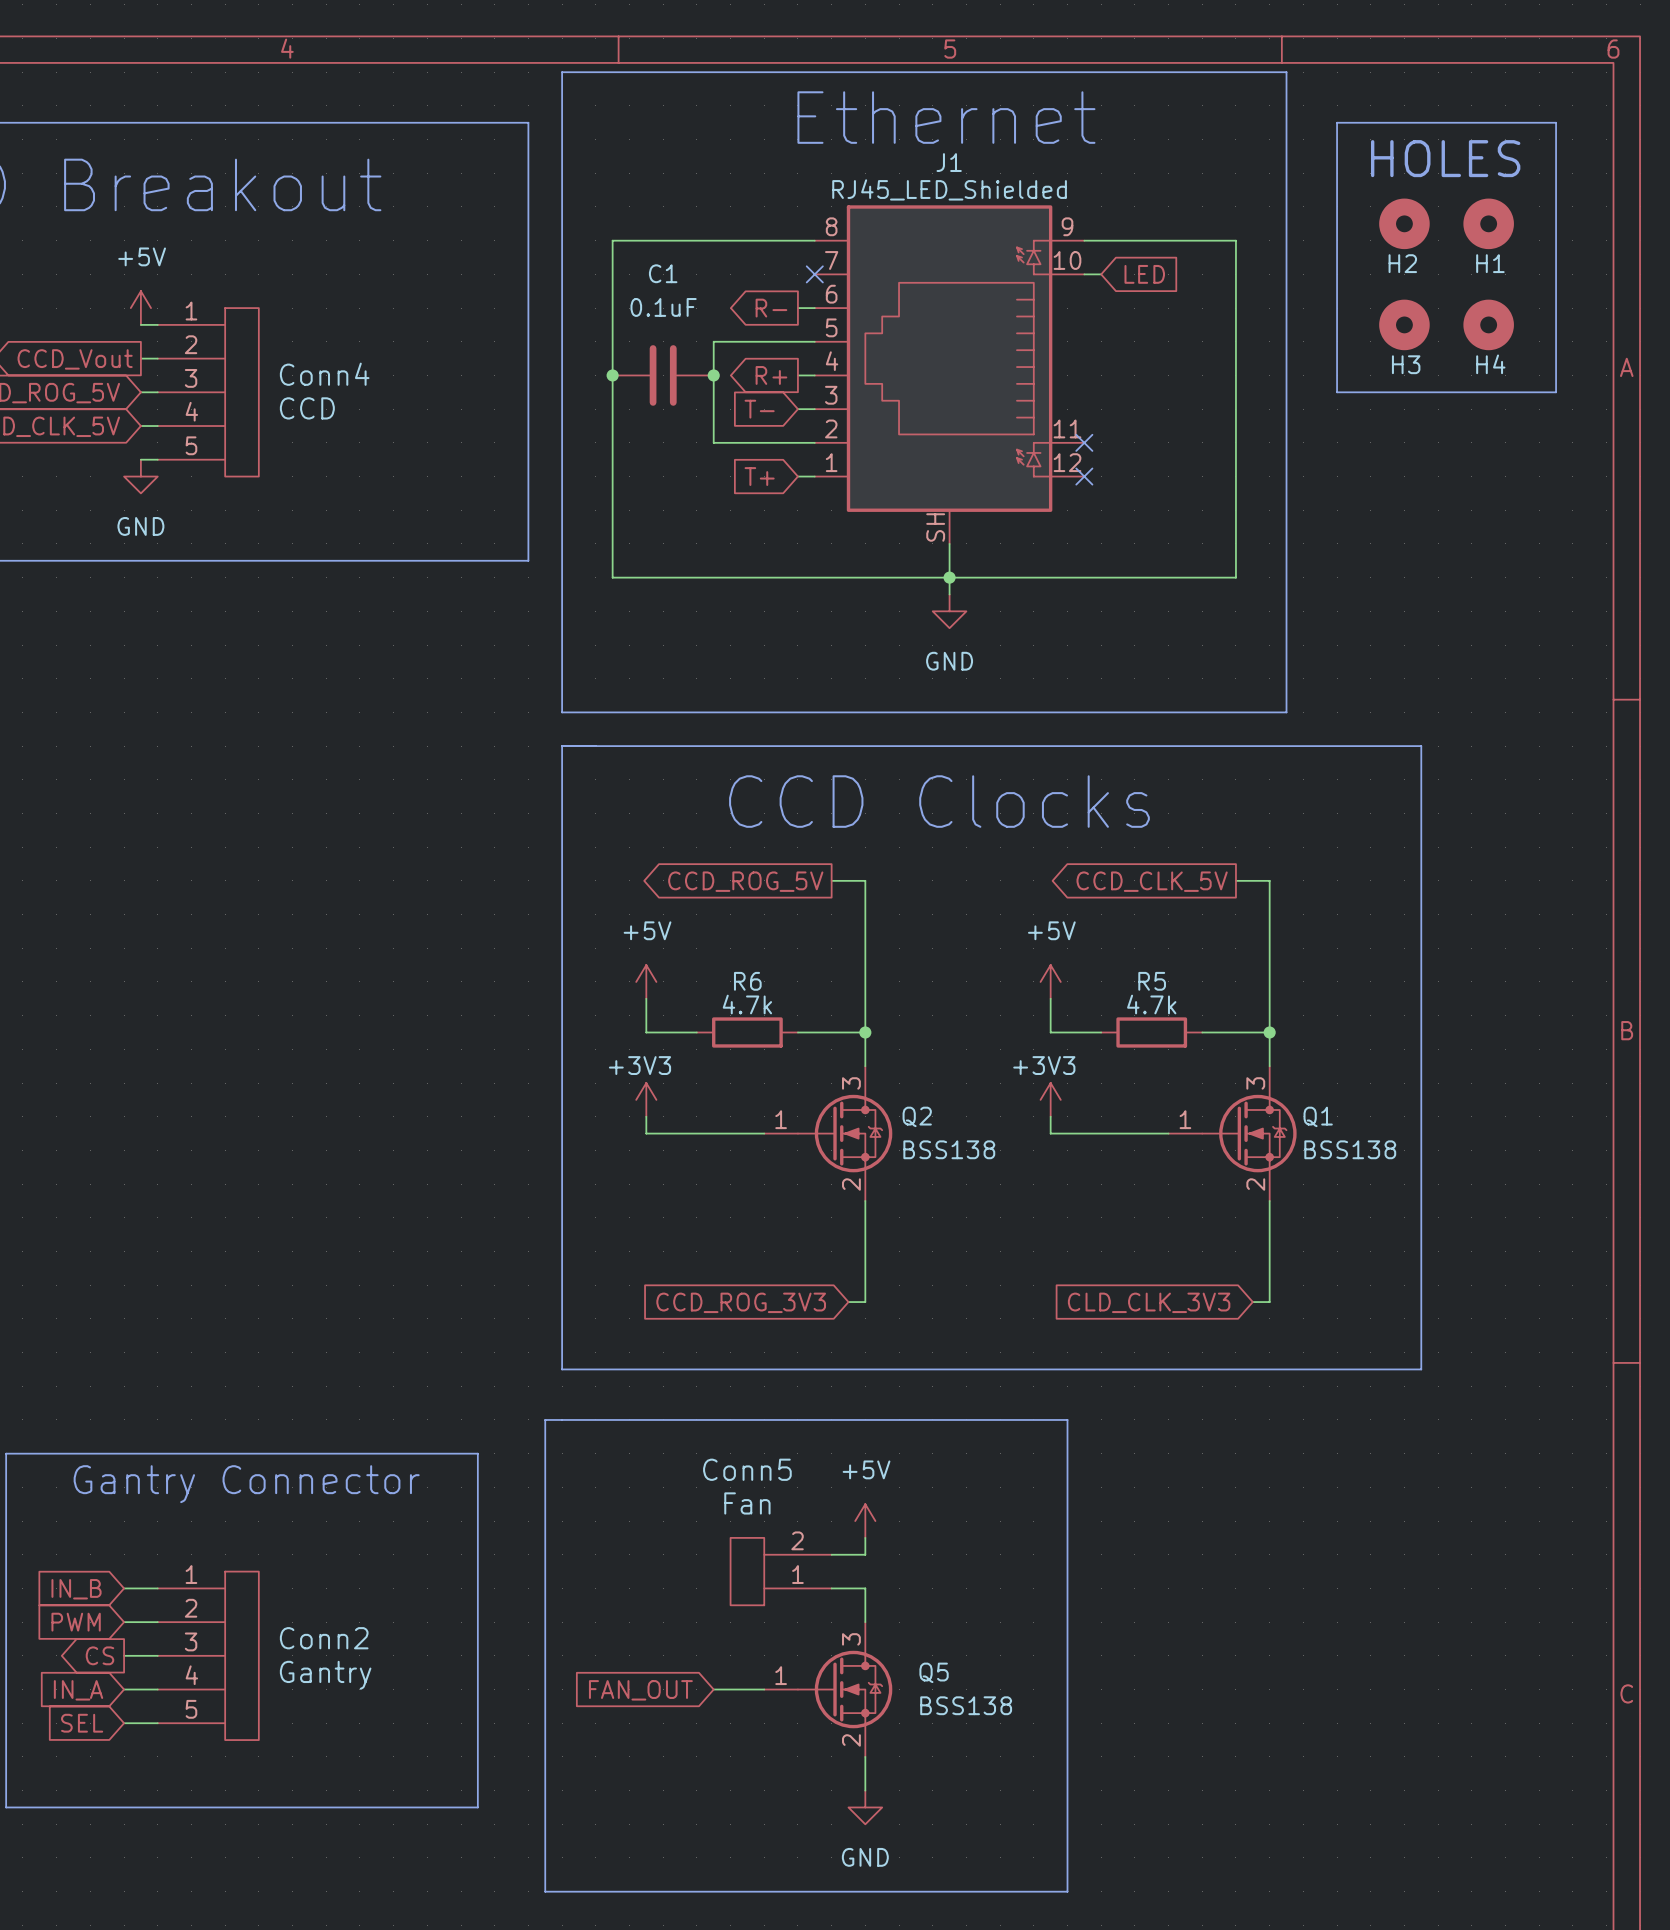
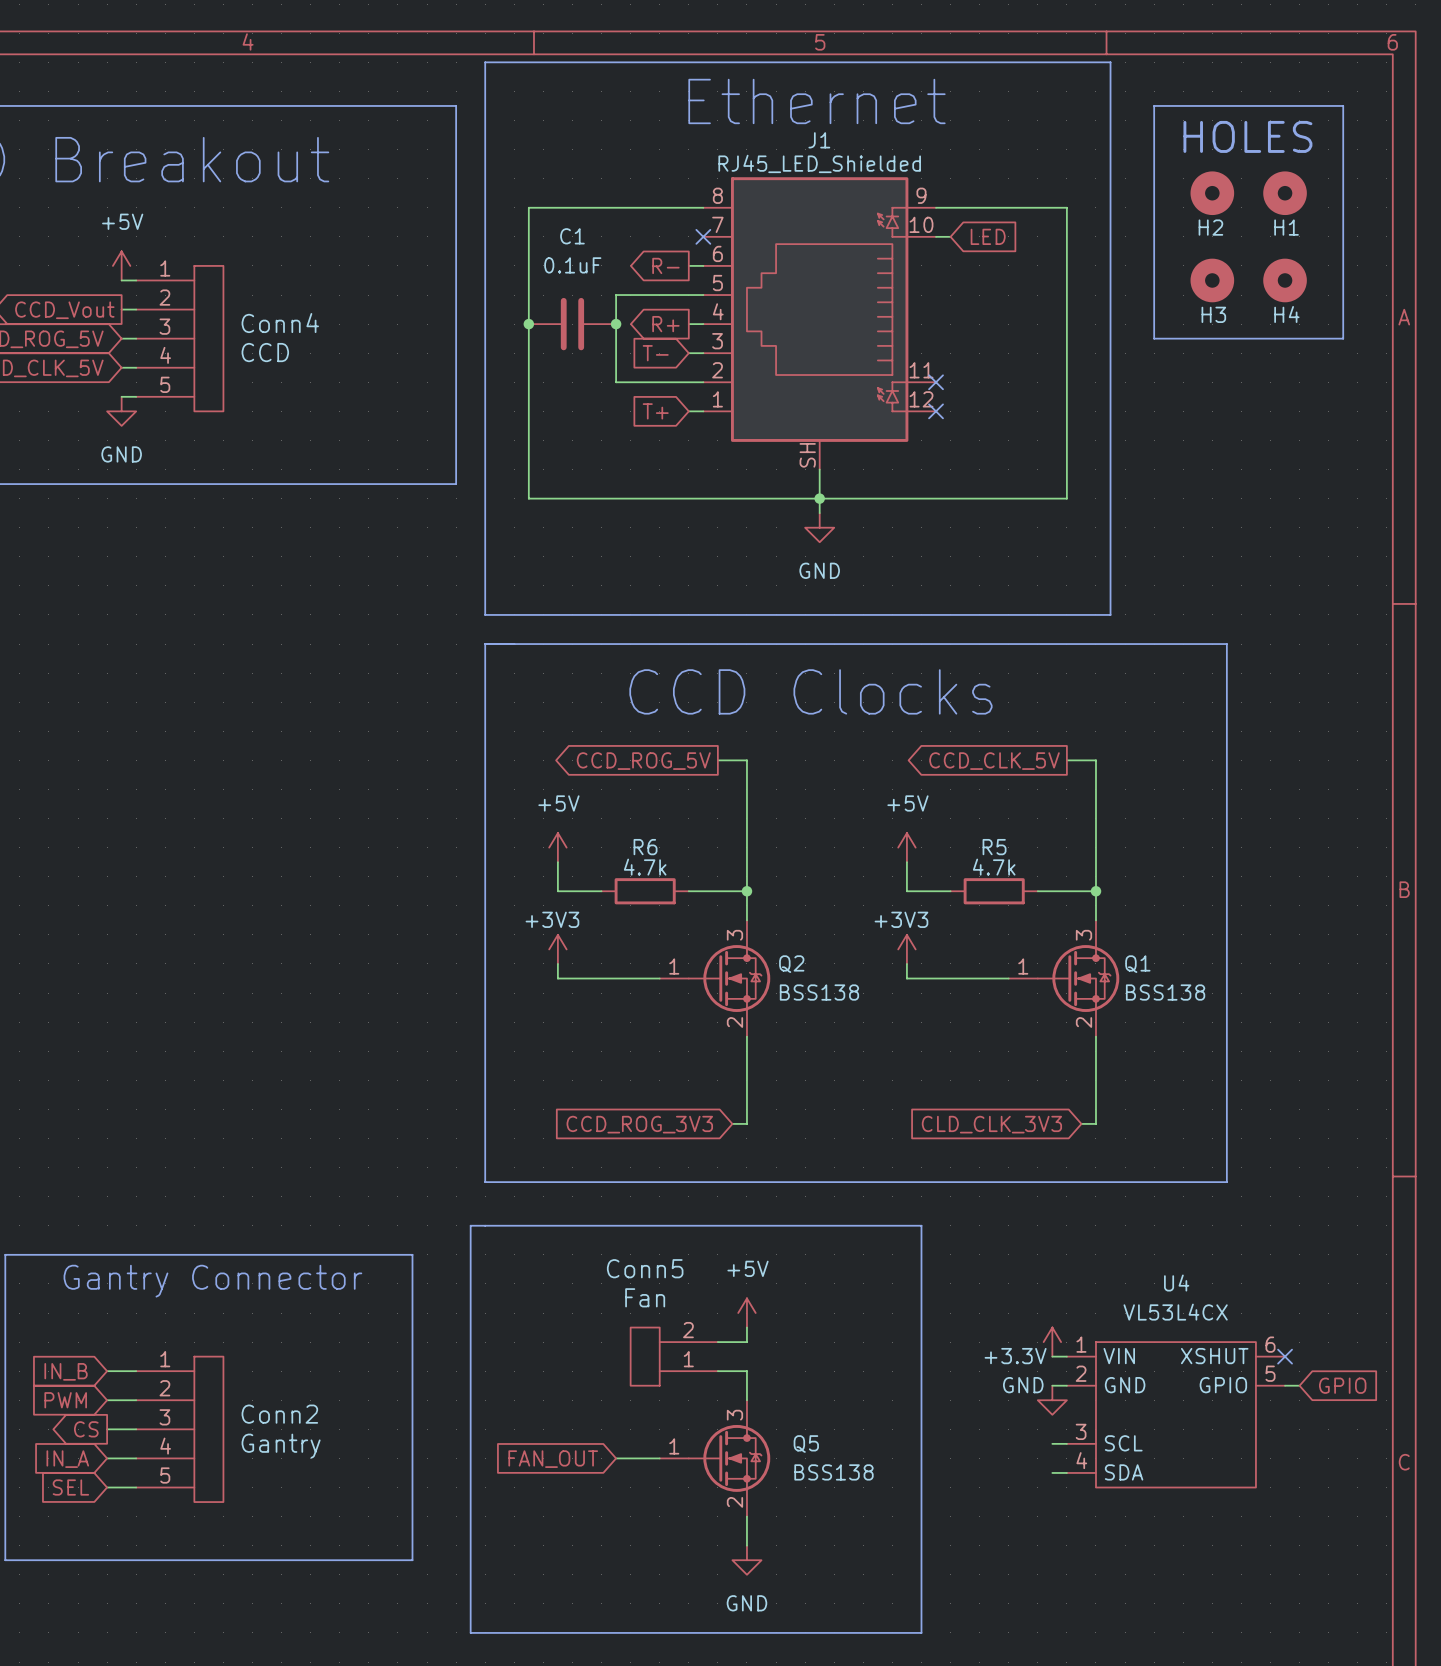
power symbol: none -> +3.3V (1052, 1342)
wire: none -> (1052, 1356) (1066, 1356)
no-connect mark: none -> (1285, 1356)
wire: none -> (1052, 1385) (1066, 1385)
wire: none -> (1285, 1385) (1299, 1385)
global label: none -> GPIO (1342, 1385)
power symbol: none -> GND (1052, 1400)
U4: none -> VL53L4CX (1175, 1414)
wire: none -> (1052, 1443) (1066, 1443)
wire: none -> (1052, 1472) (1066, 1472)

